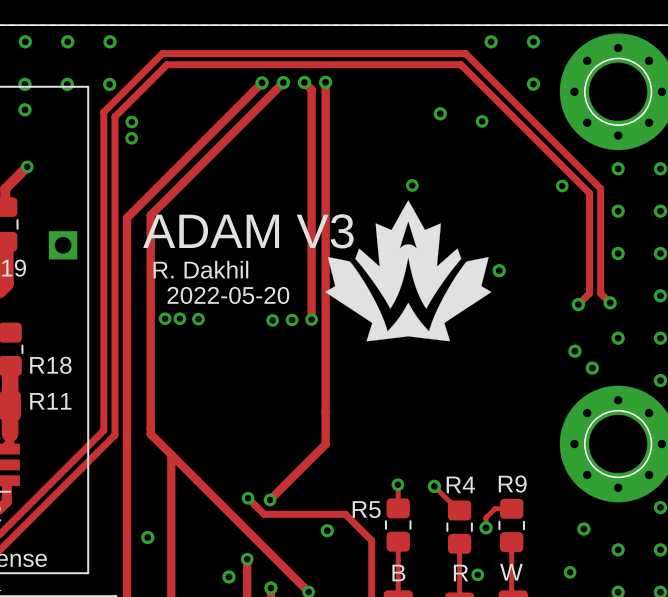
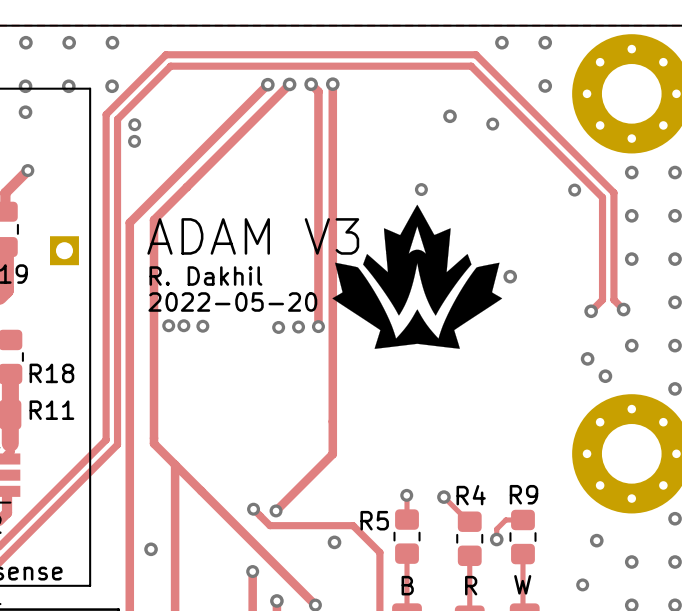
round board edge: [584, 58, 652, 126] -> none
round board edge: [584, 410, 652, 478] -> none
via: (477, 574) -> none
via: (229, 576) -> none

